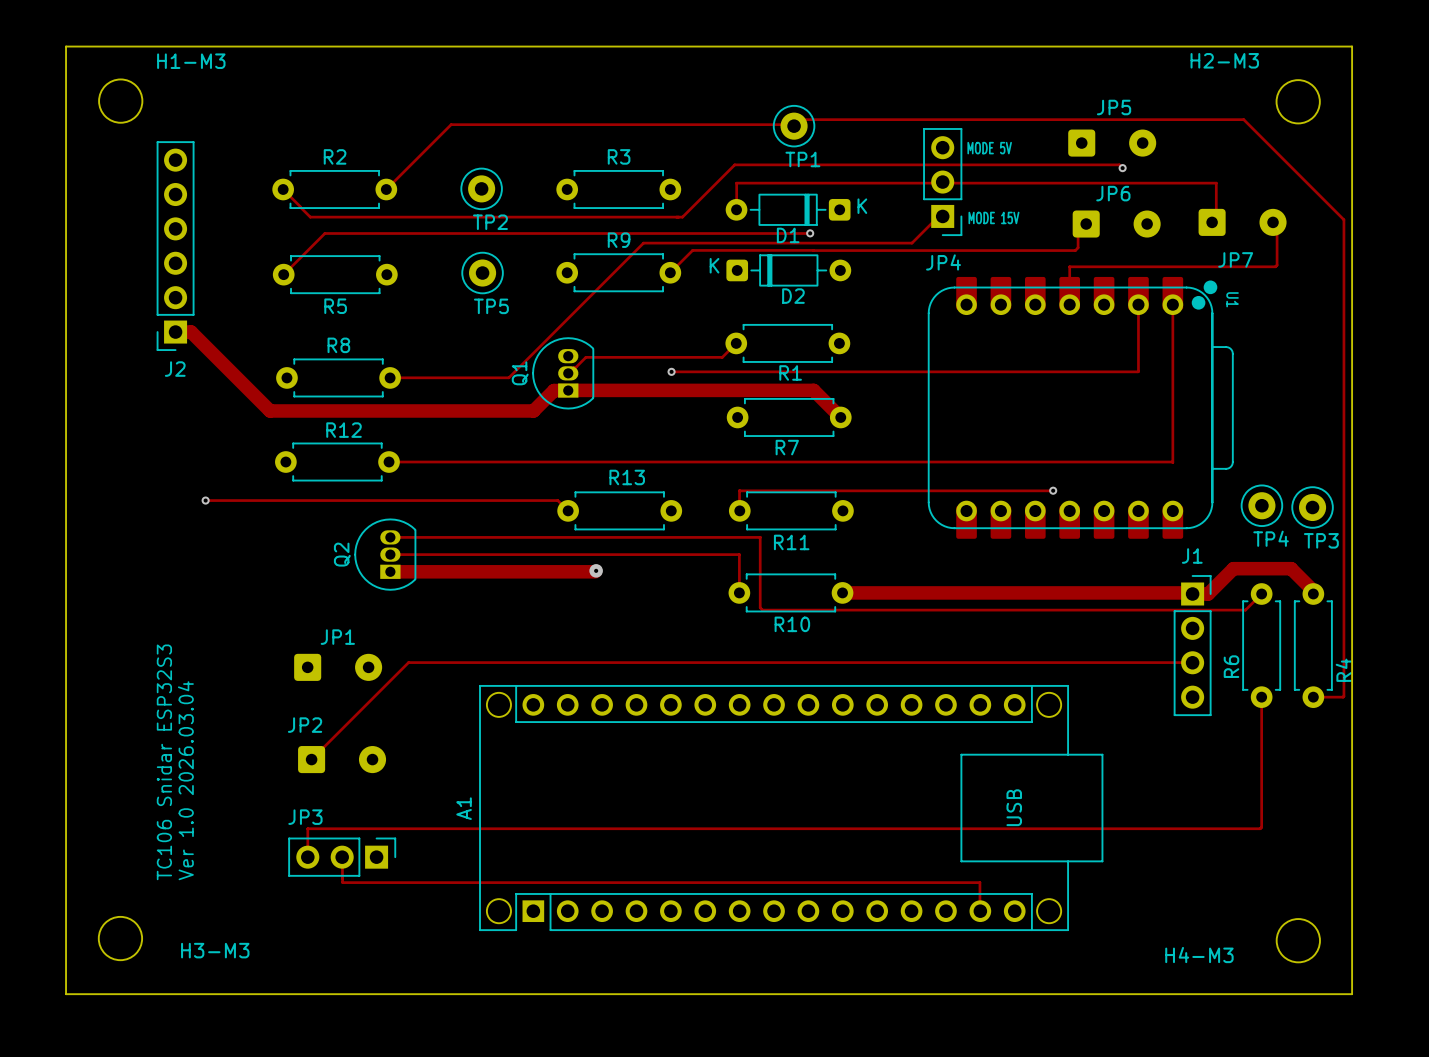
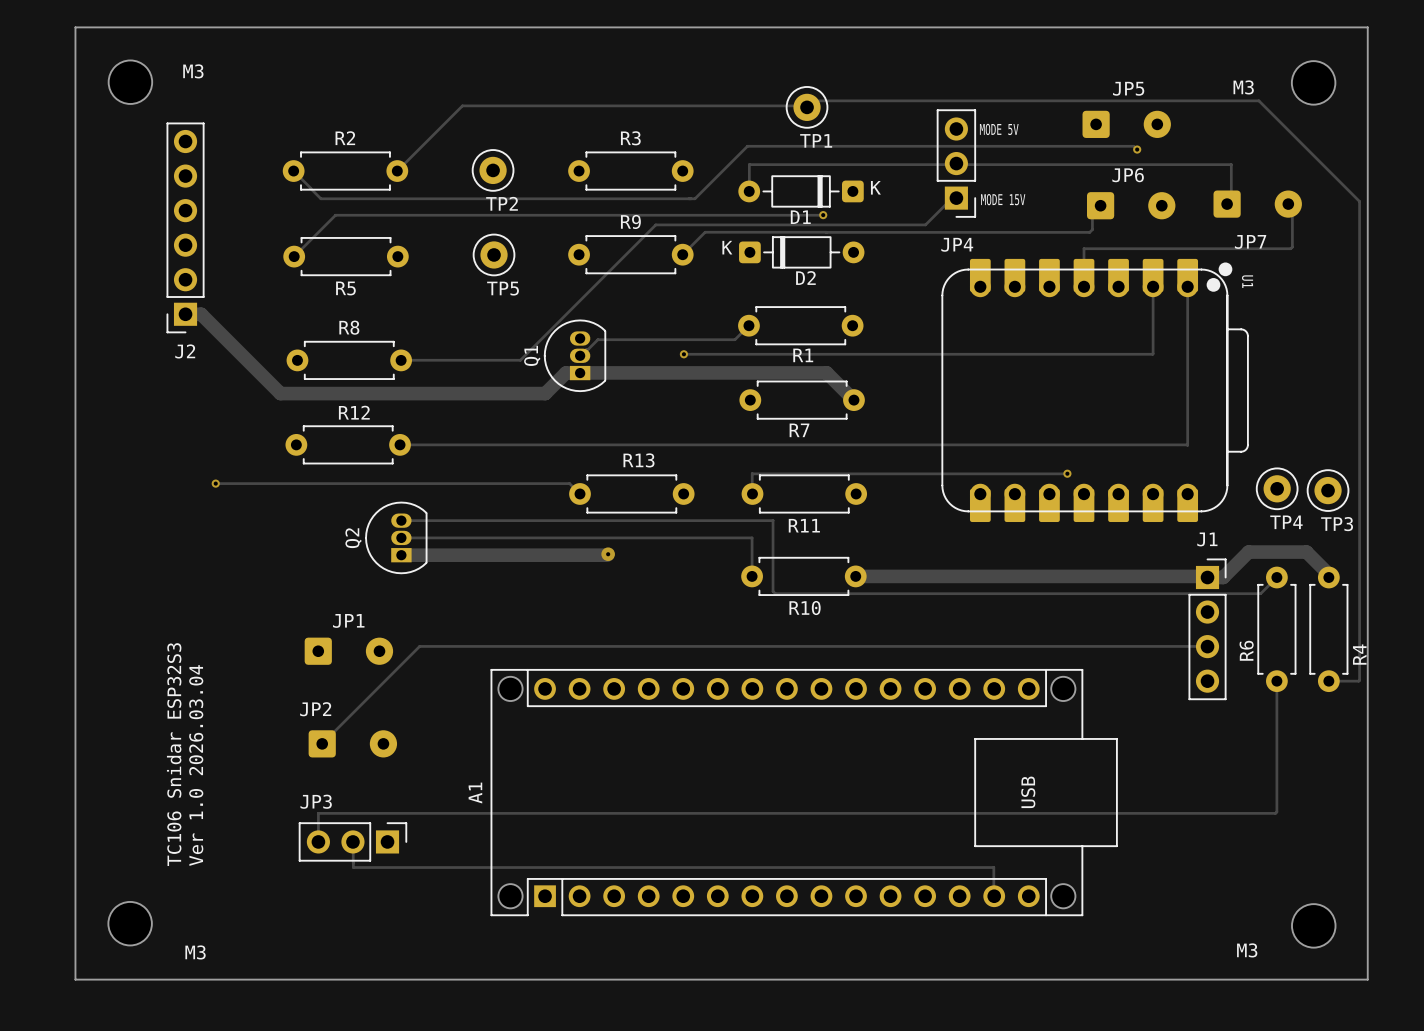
H2-M3 name: H2-M3 (1224, 60) -> M3 (1243, 87)
H1-M3 name: H1-M3 (191, 61) -> M3 (193, 71)
H3-M3 name: H3-M3 (215, 950) -> M3 (195, 952)
H4-M3 name: H4-M3 (1199, 955) -> M3 (1247, 950)

